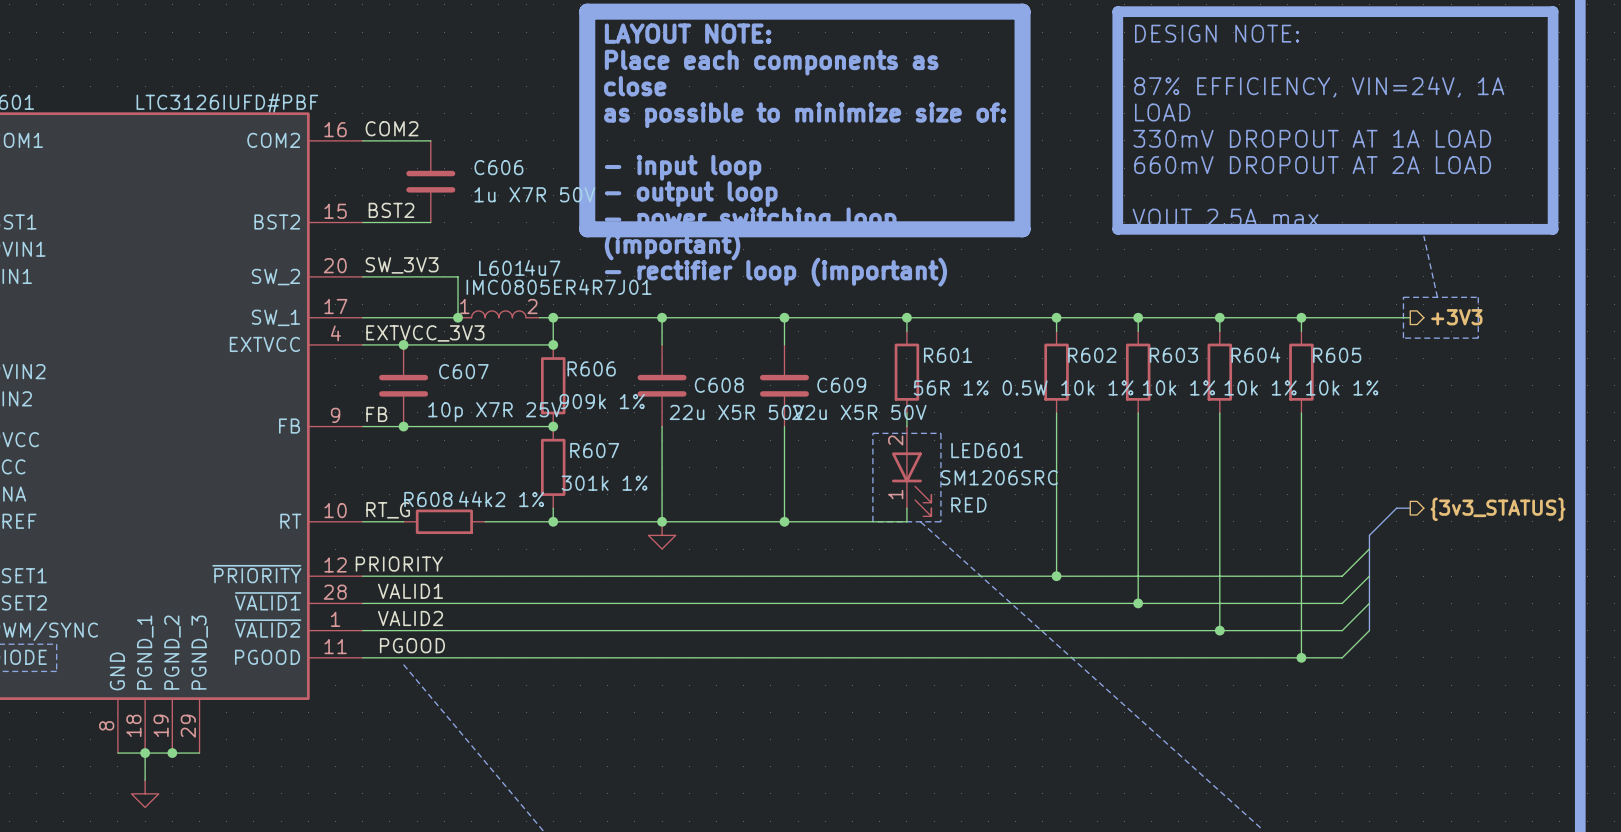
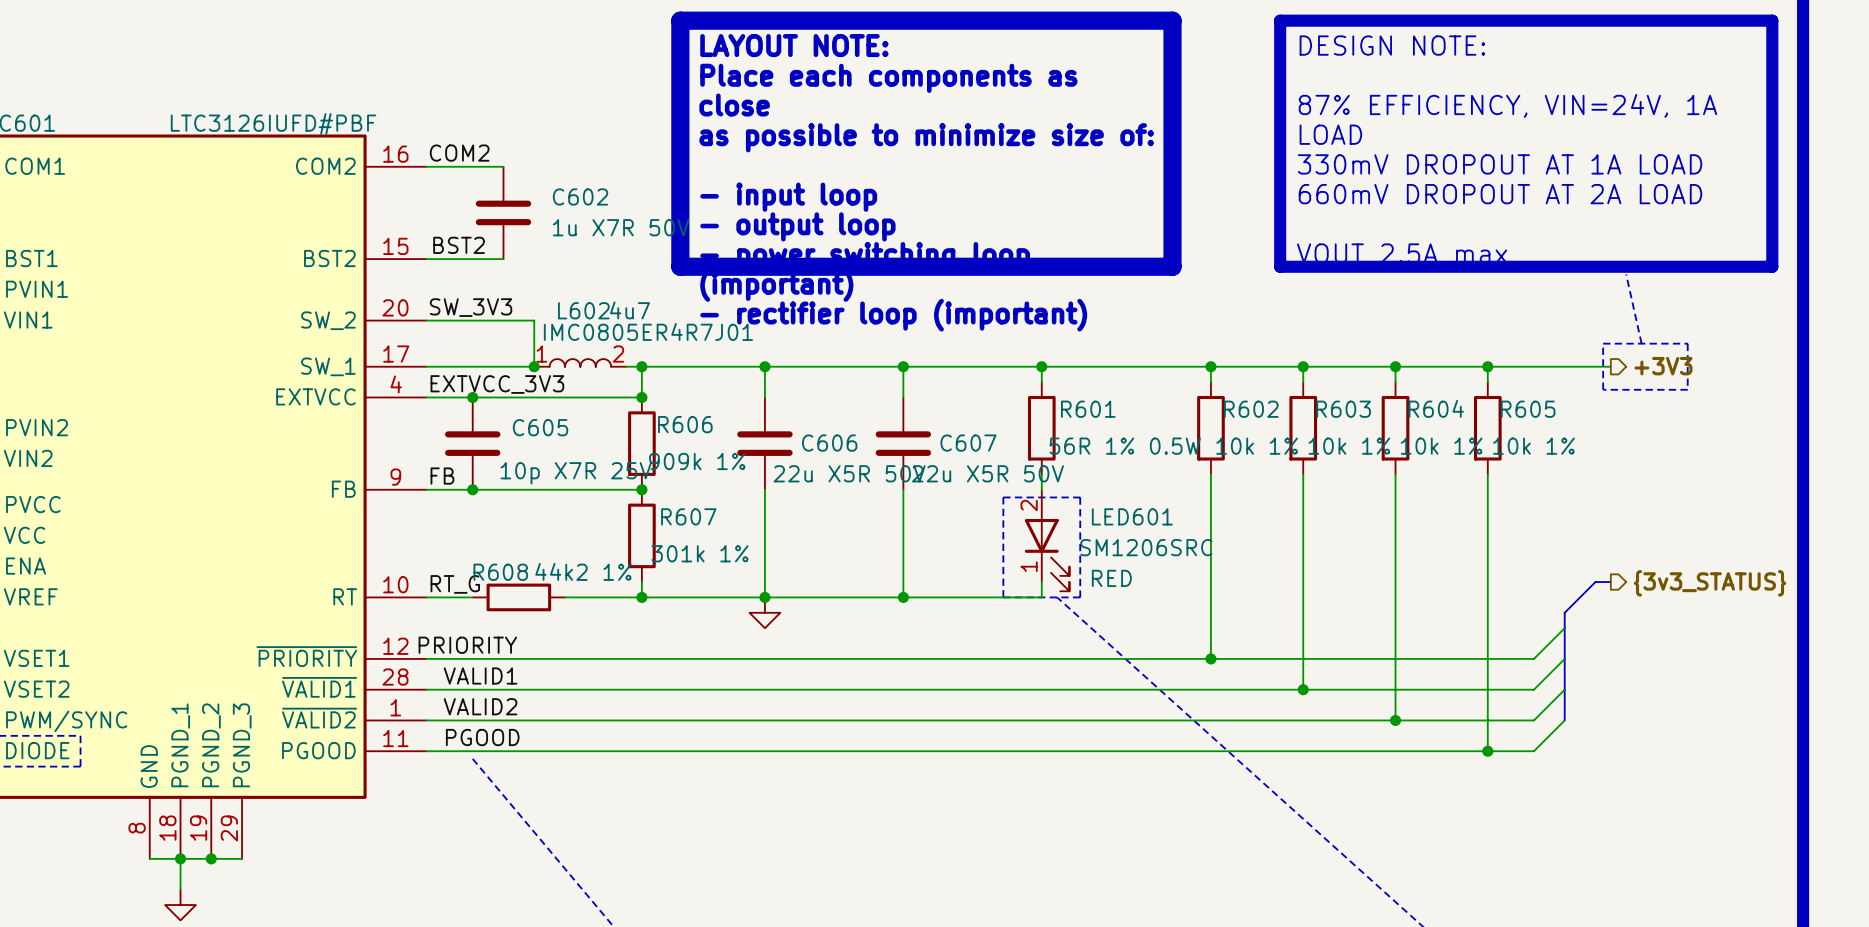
C606 name: C606 (498, 167) -> C602 (580, 196)
L601 name: L601 (501, 268) -> L602 (583, 310)
C607 name: C607 (463, 371) -> C605 (540, 427)
C608 name: C608 (719, 385) -> C606 (829, 443)
C609 name: C609 (841, 385) -> C607 (968, 443)

